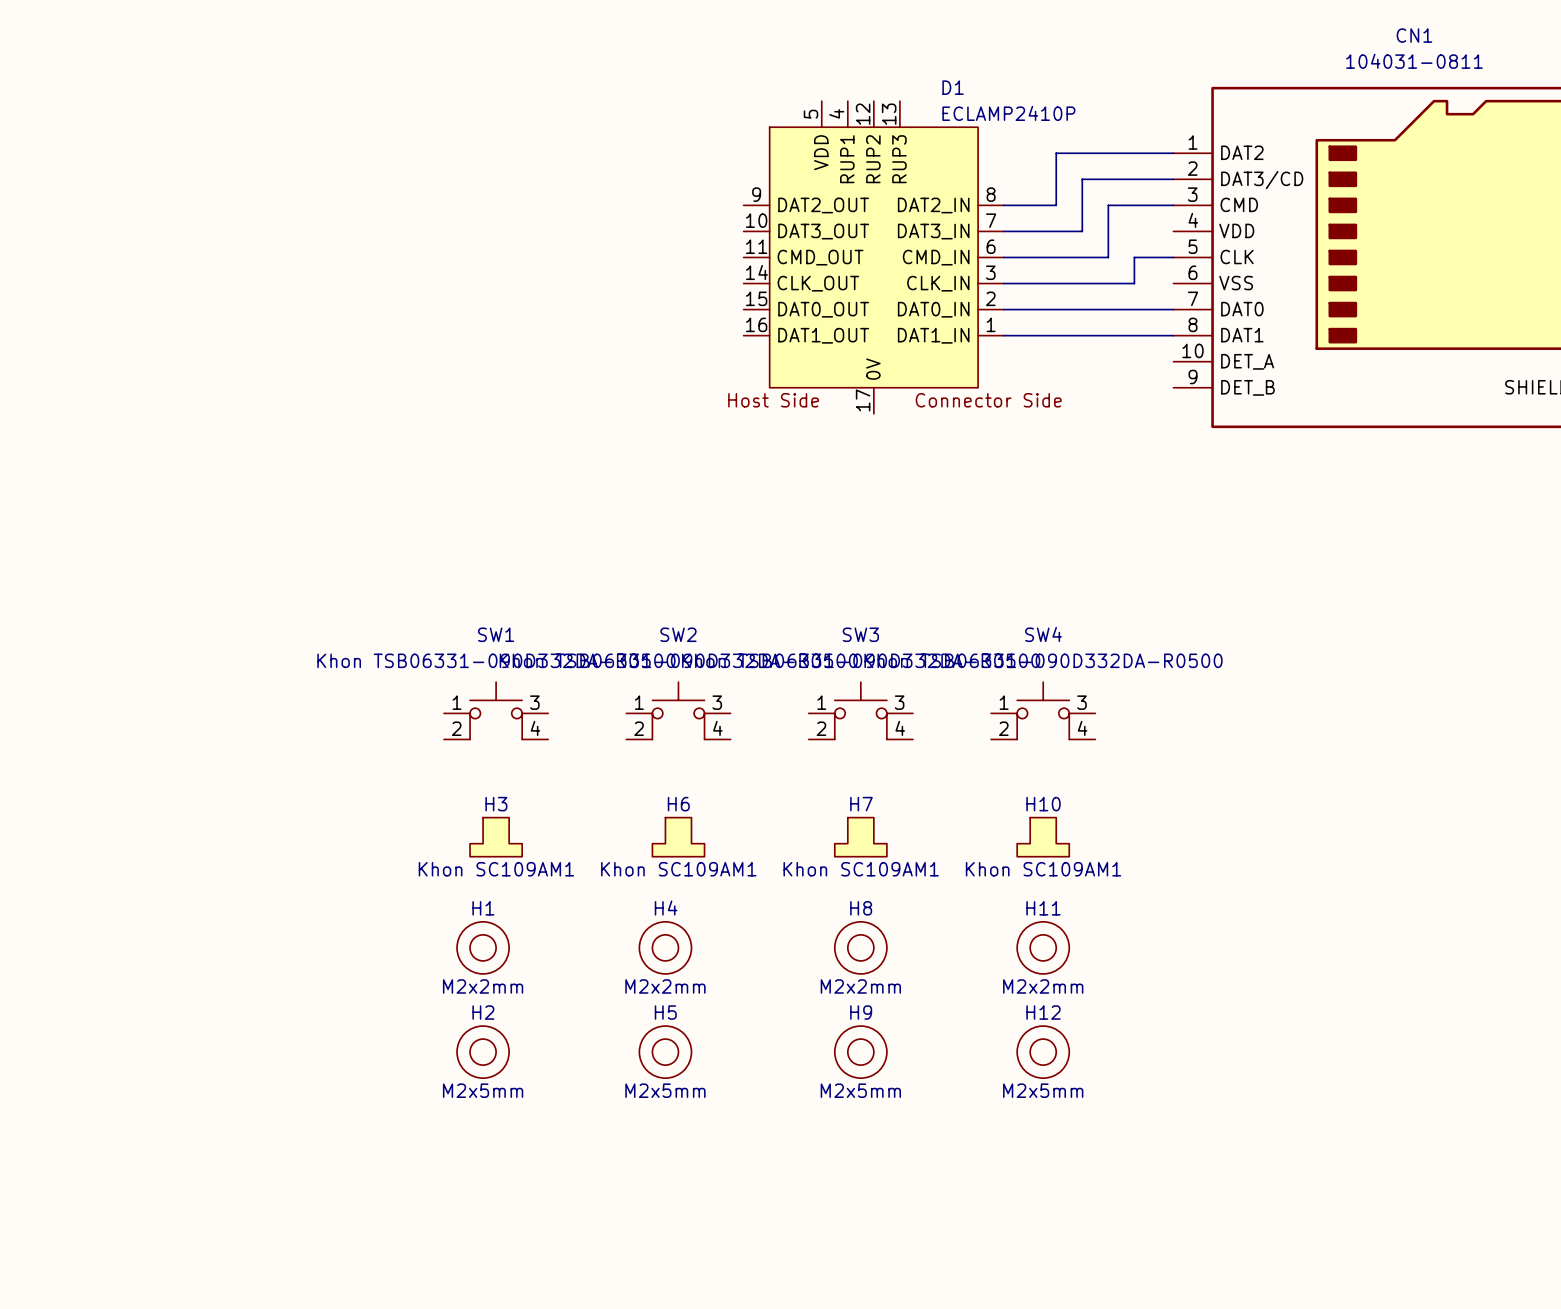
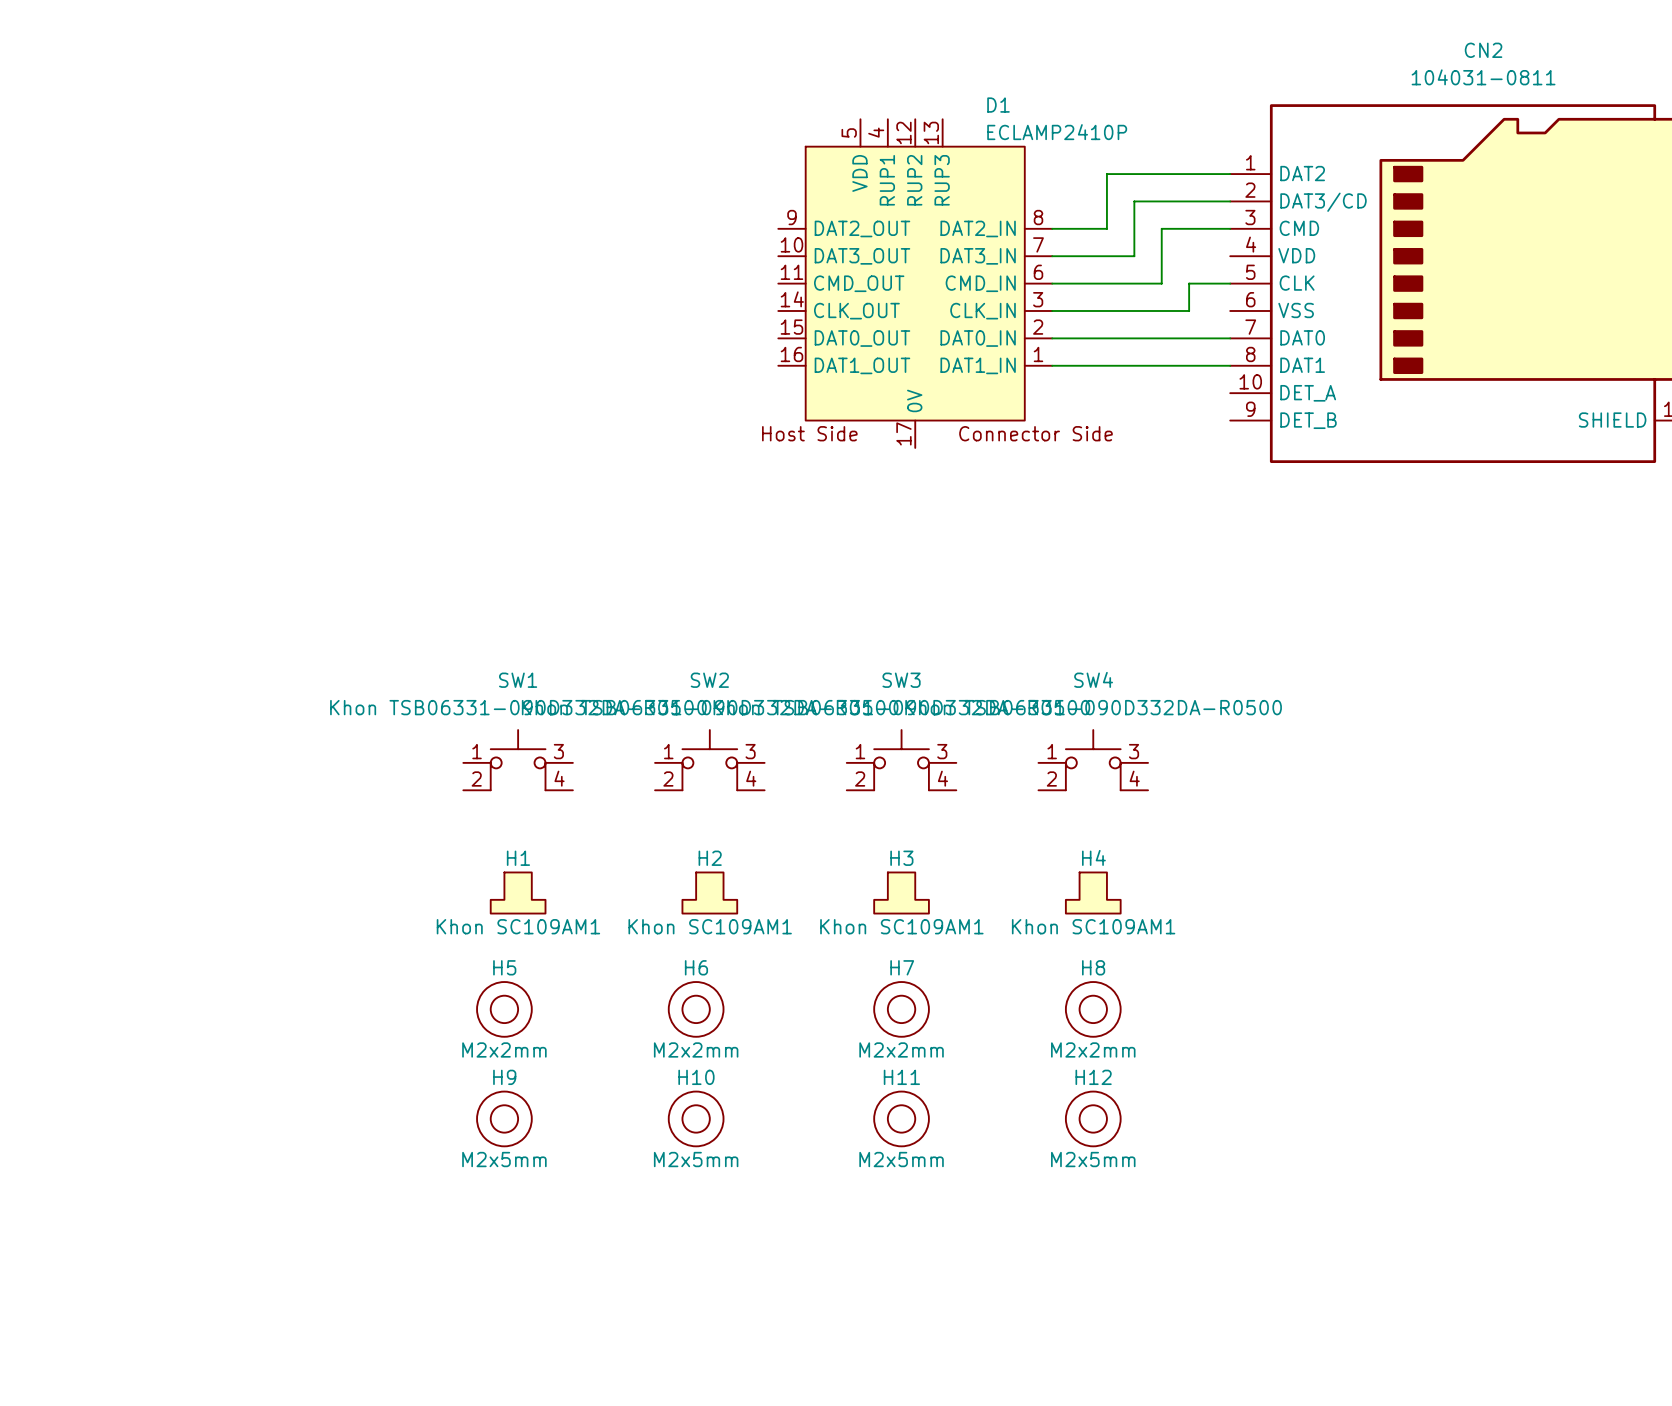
CN1 name: CN1 (1414, 35) -> CN2 (1483, 50)
H3 name: H3 (496, 804) -> H1 (518, 858)
H6 name: H6 (678, 804) -> H2 (710, 858)
H7 name: H7 (861, 804) -> H3 (901, 858)
H10 name: H10 (1043, 804) -> H4 (1093, 857)
H1 name: H1 (483, 908) -> H5 (504, 967)
H4 name: H4 (666, 908) -> H6 (696, 967)
H8 name: H8 (861, 908) -> H7 (902, 967)
H11 name: H11 (1043, 908) -> H8 (1093, 967)
H2 name: H2 (483, 1012) -> H9 (504, 1077)
H5 name: H5 (665, 1012) -> H10 (696, 1077)
H9 name: H9 (861, 1012) -> H11 (901, 1077)

